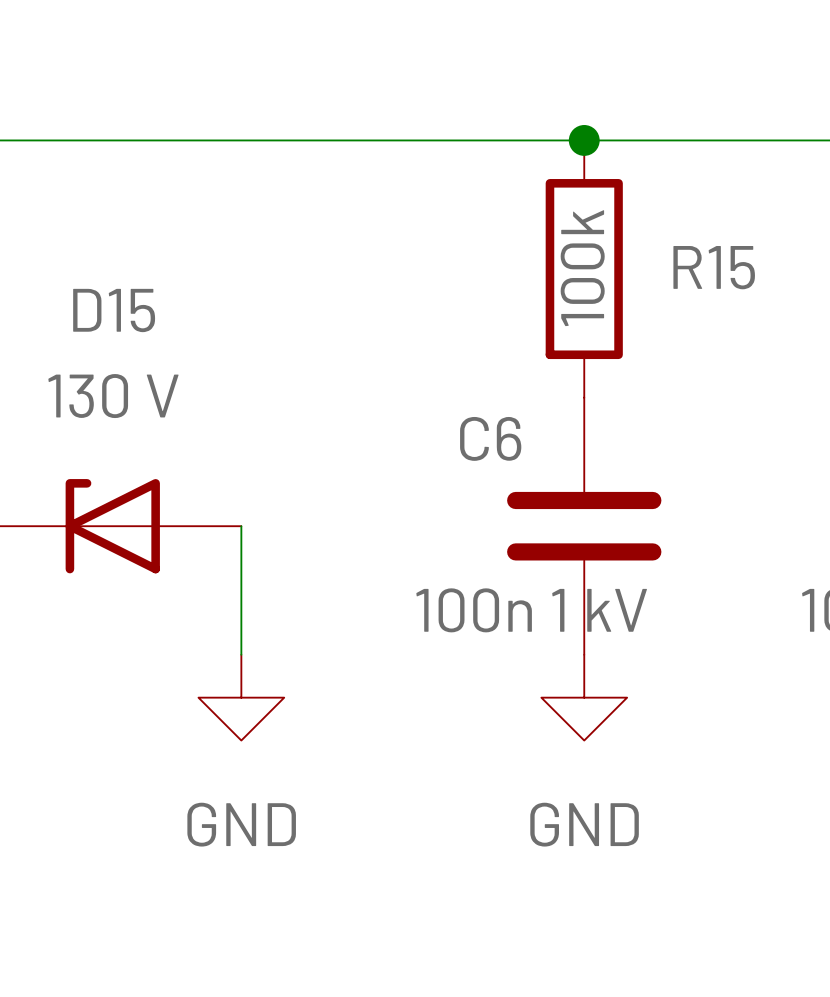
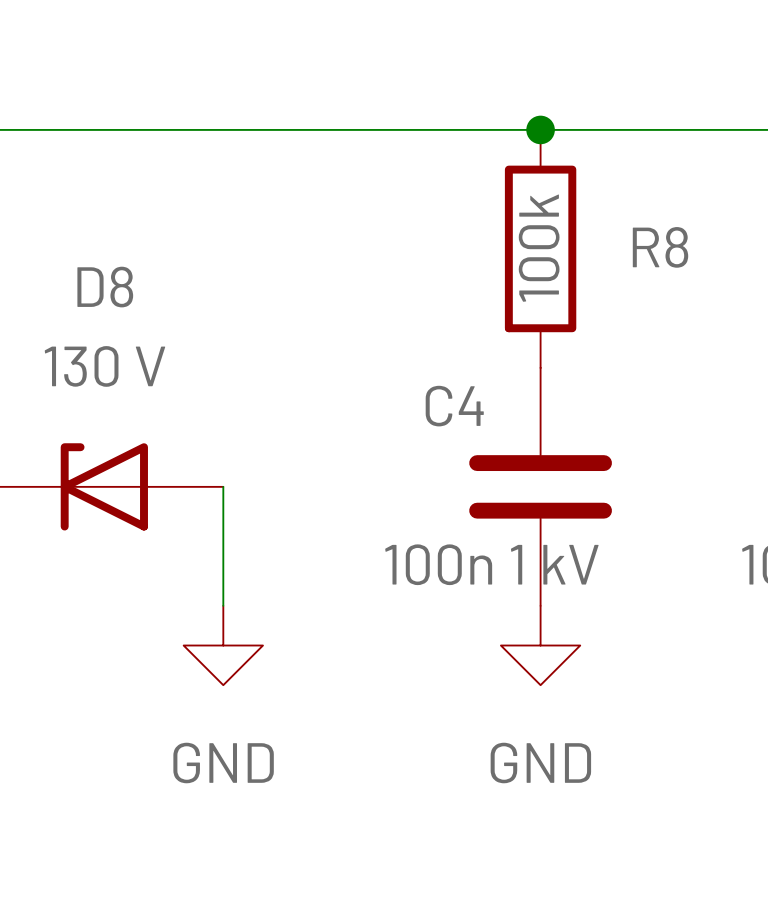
R15 name: R15 (714, 267) -> R8 (660, 247)
D15 name: D15 (114, 310) -> D8 (105, 287)
C6 name: C6 (490, 438) -> C4 (454, 406)

